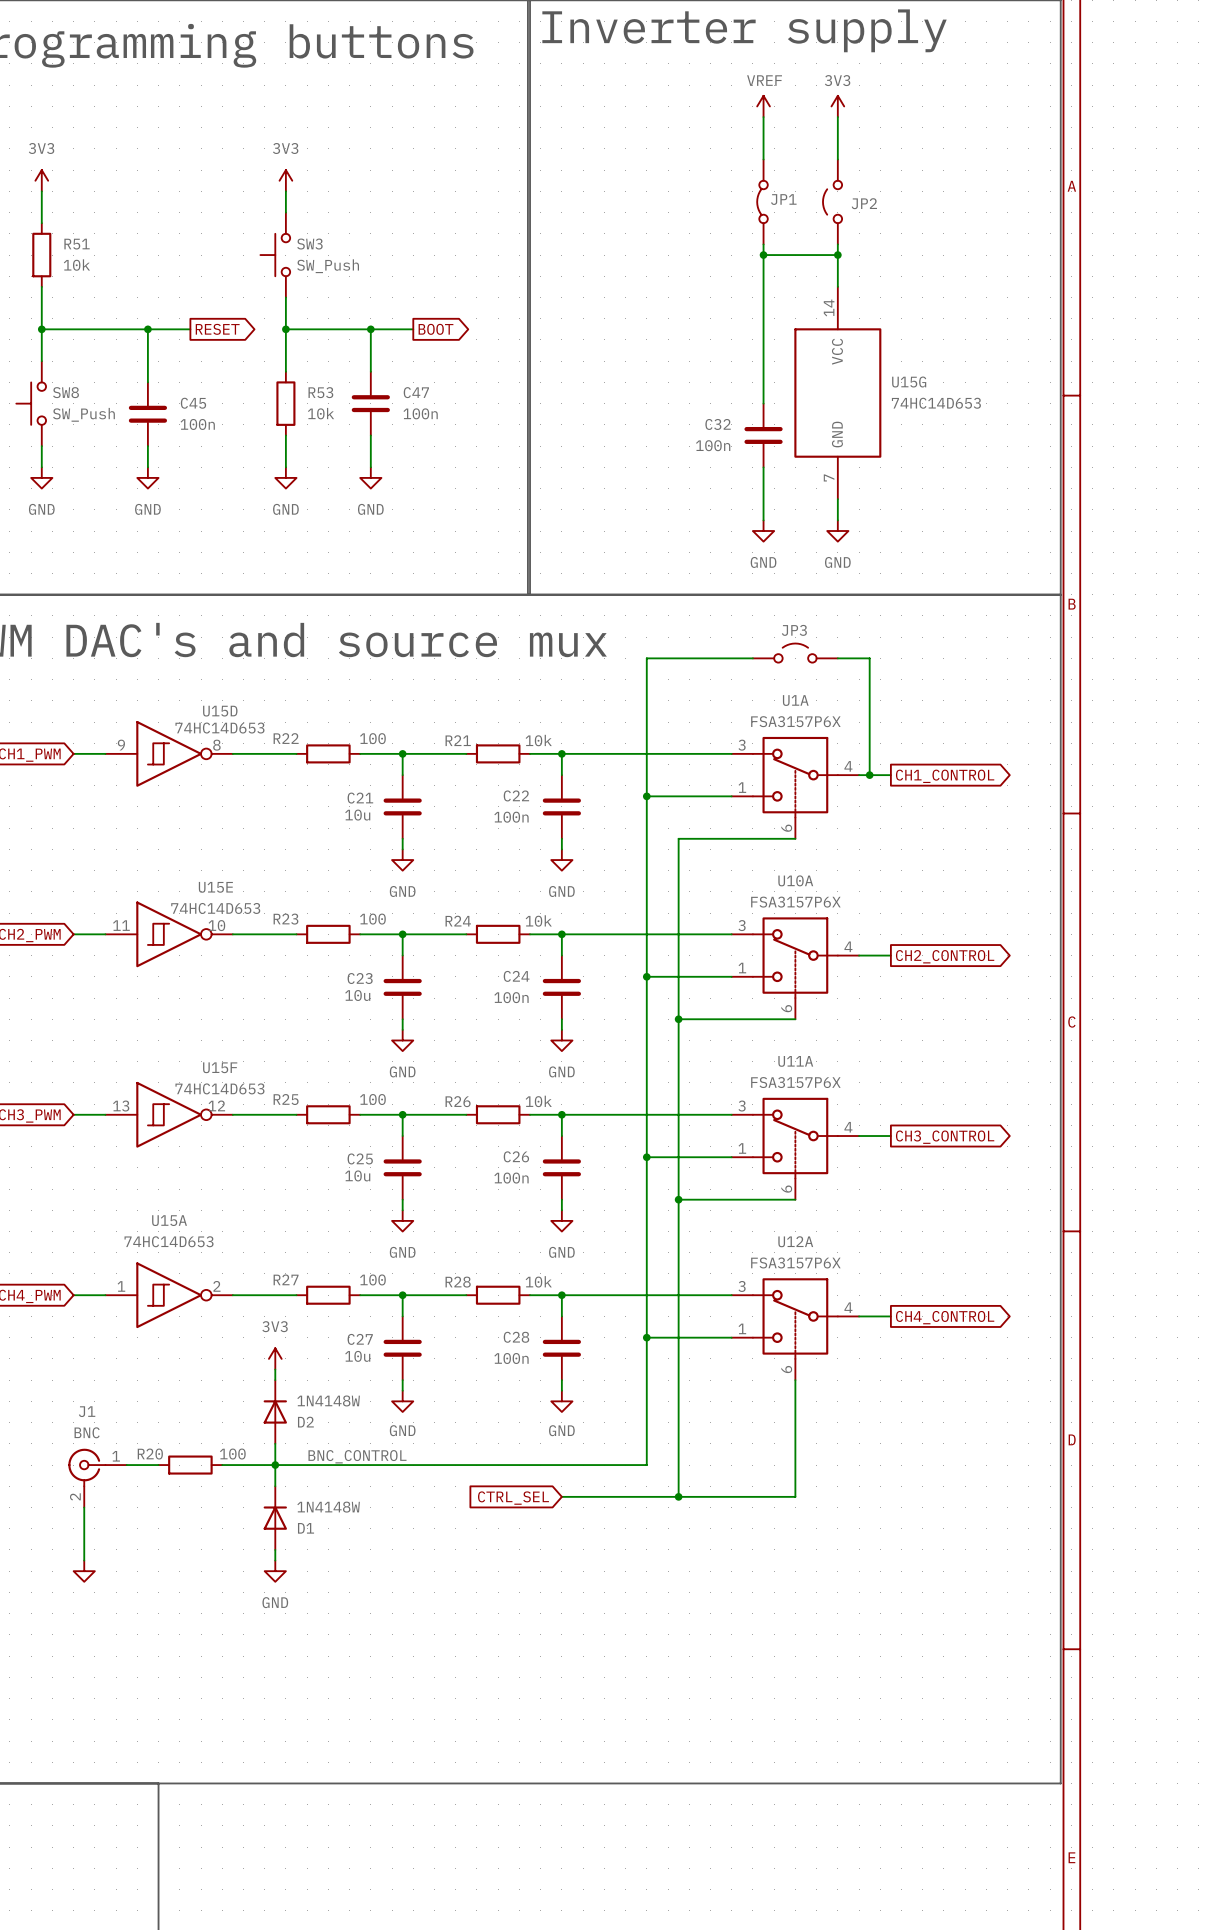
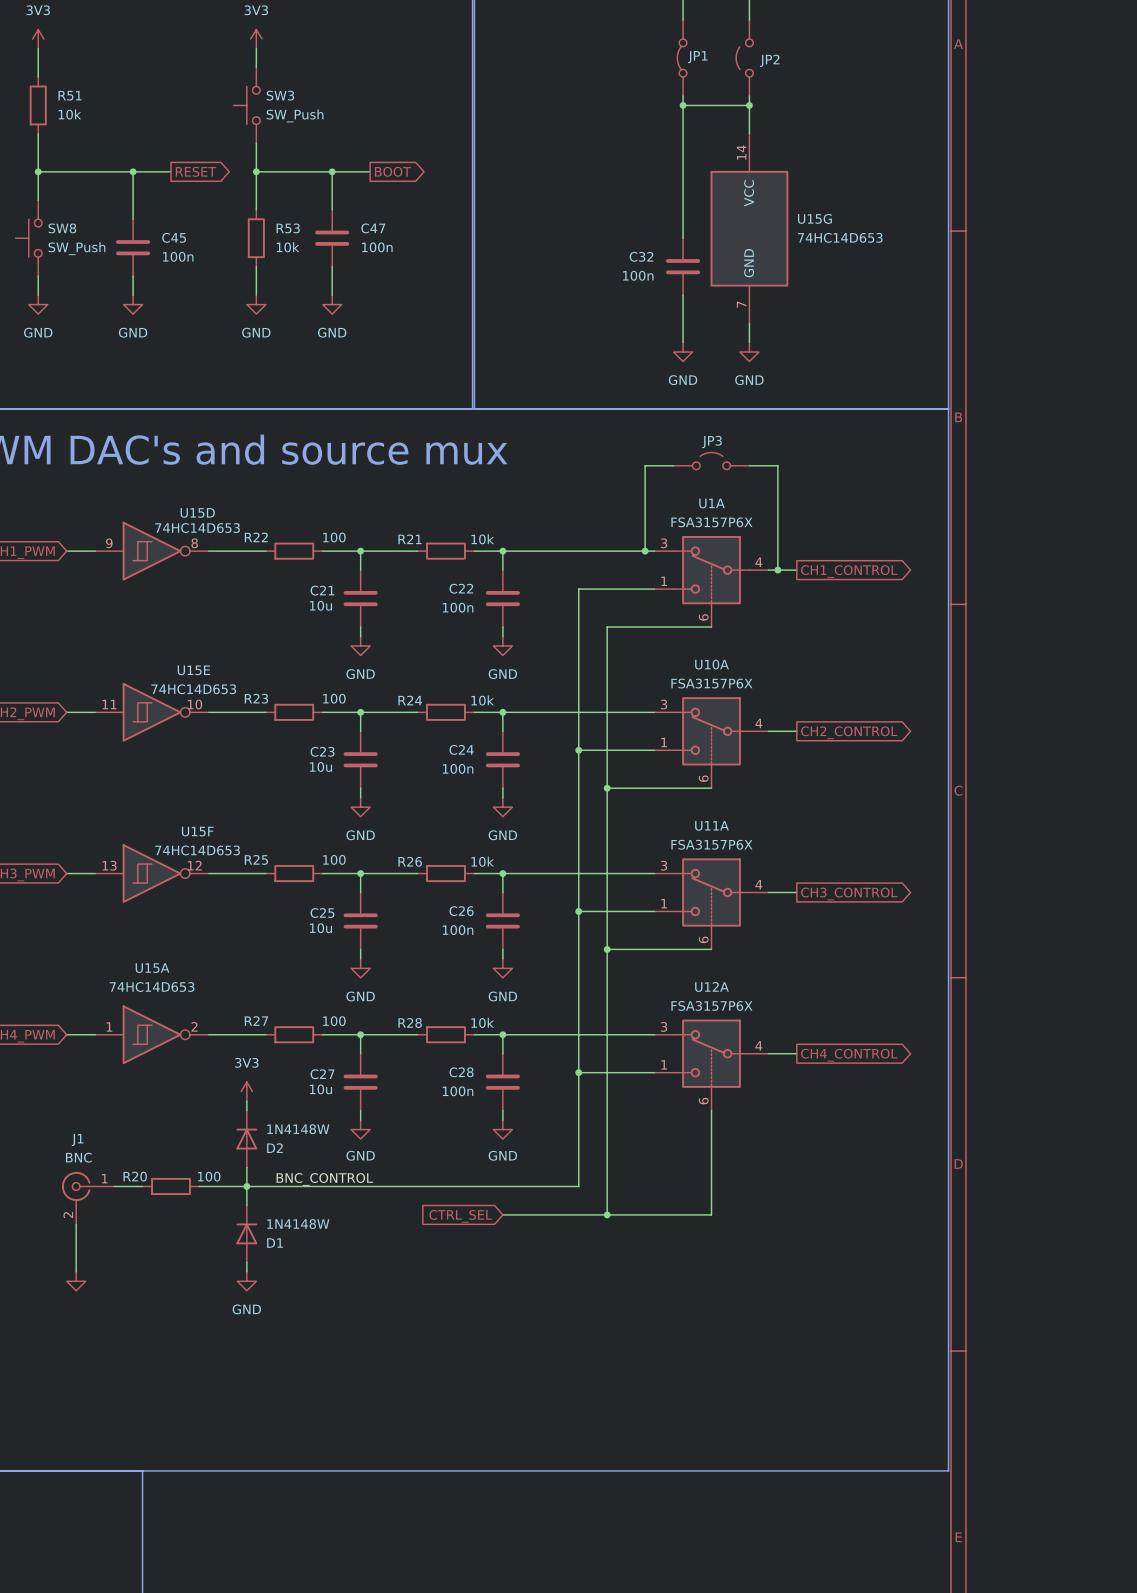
wire: (721, 658) (646, 658) (646, 796) -> (645, 465) (645, 551)
junction: none -> (645, 551)
junction: (646, 796) -> none

